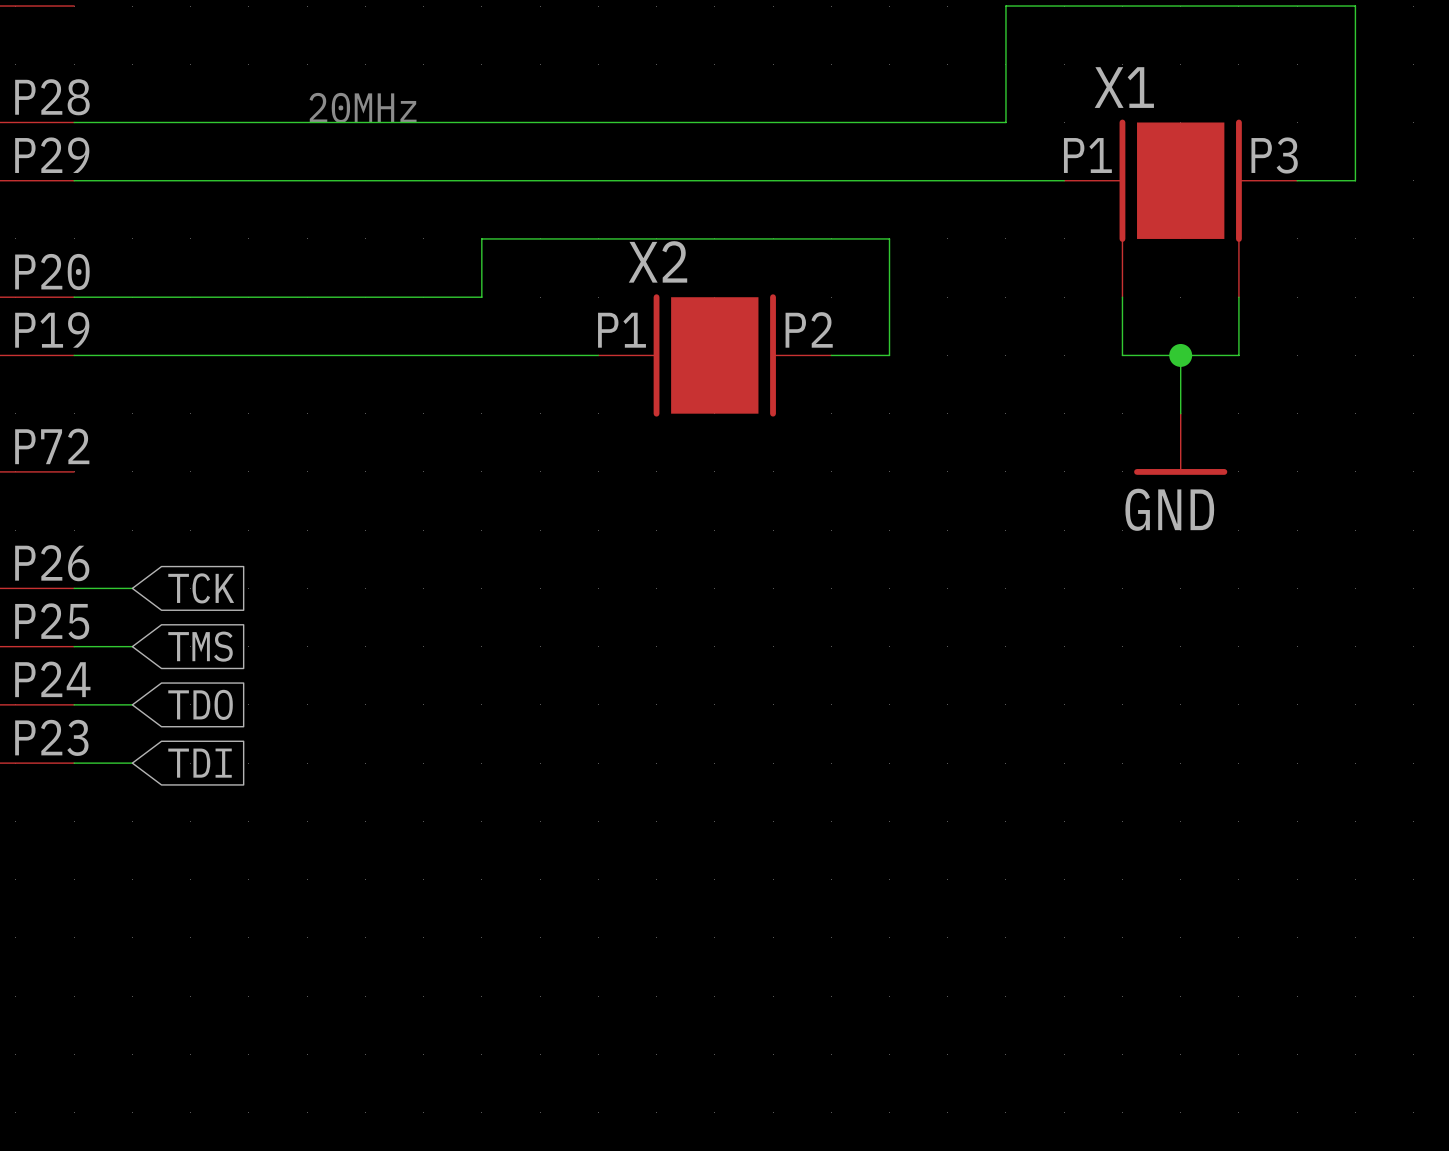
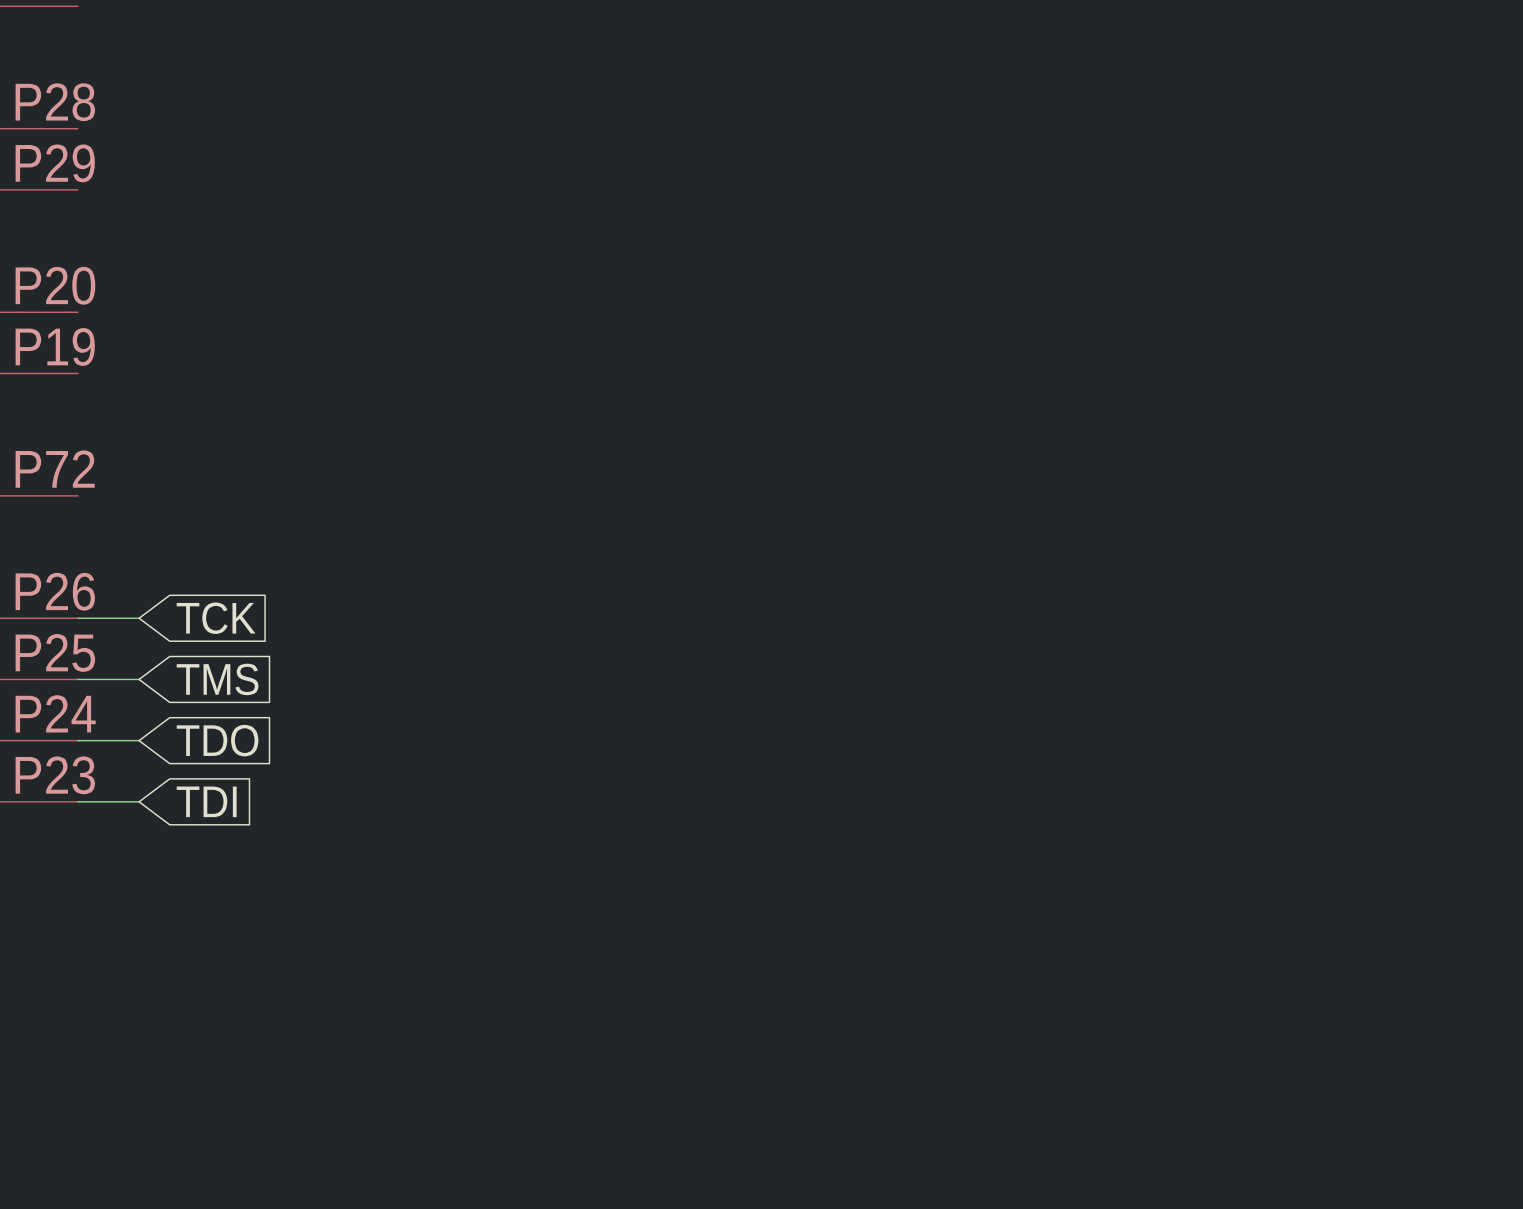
text: 20MHz (363, 107) -> none
wire: (74, 122) (1005, 122) (1005, 6) (1355, 6) (1355, 180) (1297, 180) -> none
wire: (74, 180) (1064, 180) -> none
X1: (1180, 208) -> none
wire: (74, 297) (481, 297) (481, 238) (889, 238) (889, 355) (831, 355) -> none
wire: (1122, 297) (1122, 355) (1238, 355) (1238, 297) -> none
wire: (74, 355) (598, 355) -> none
X2: (714, 355) -> none
wire: (1180, 355) (1180, 413) -> none
junction: (1180, 355) -> none
power symbol: GND (1180, 444) -> none

